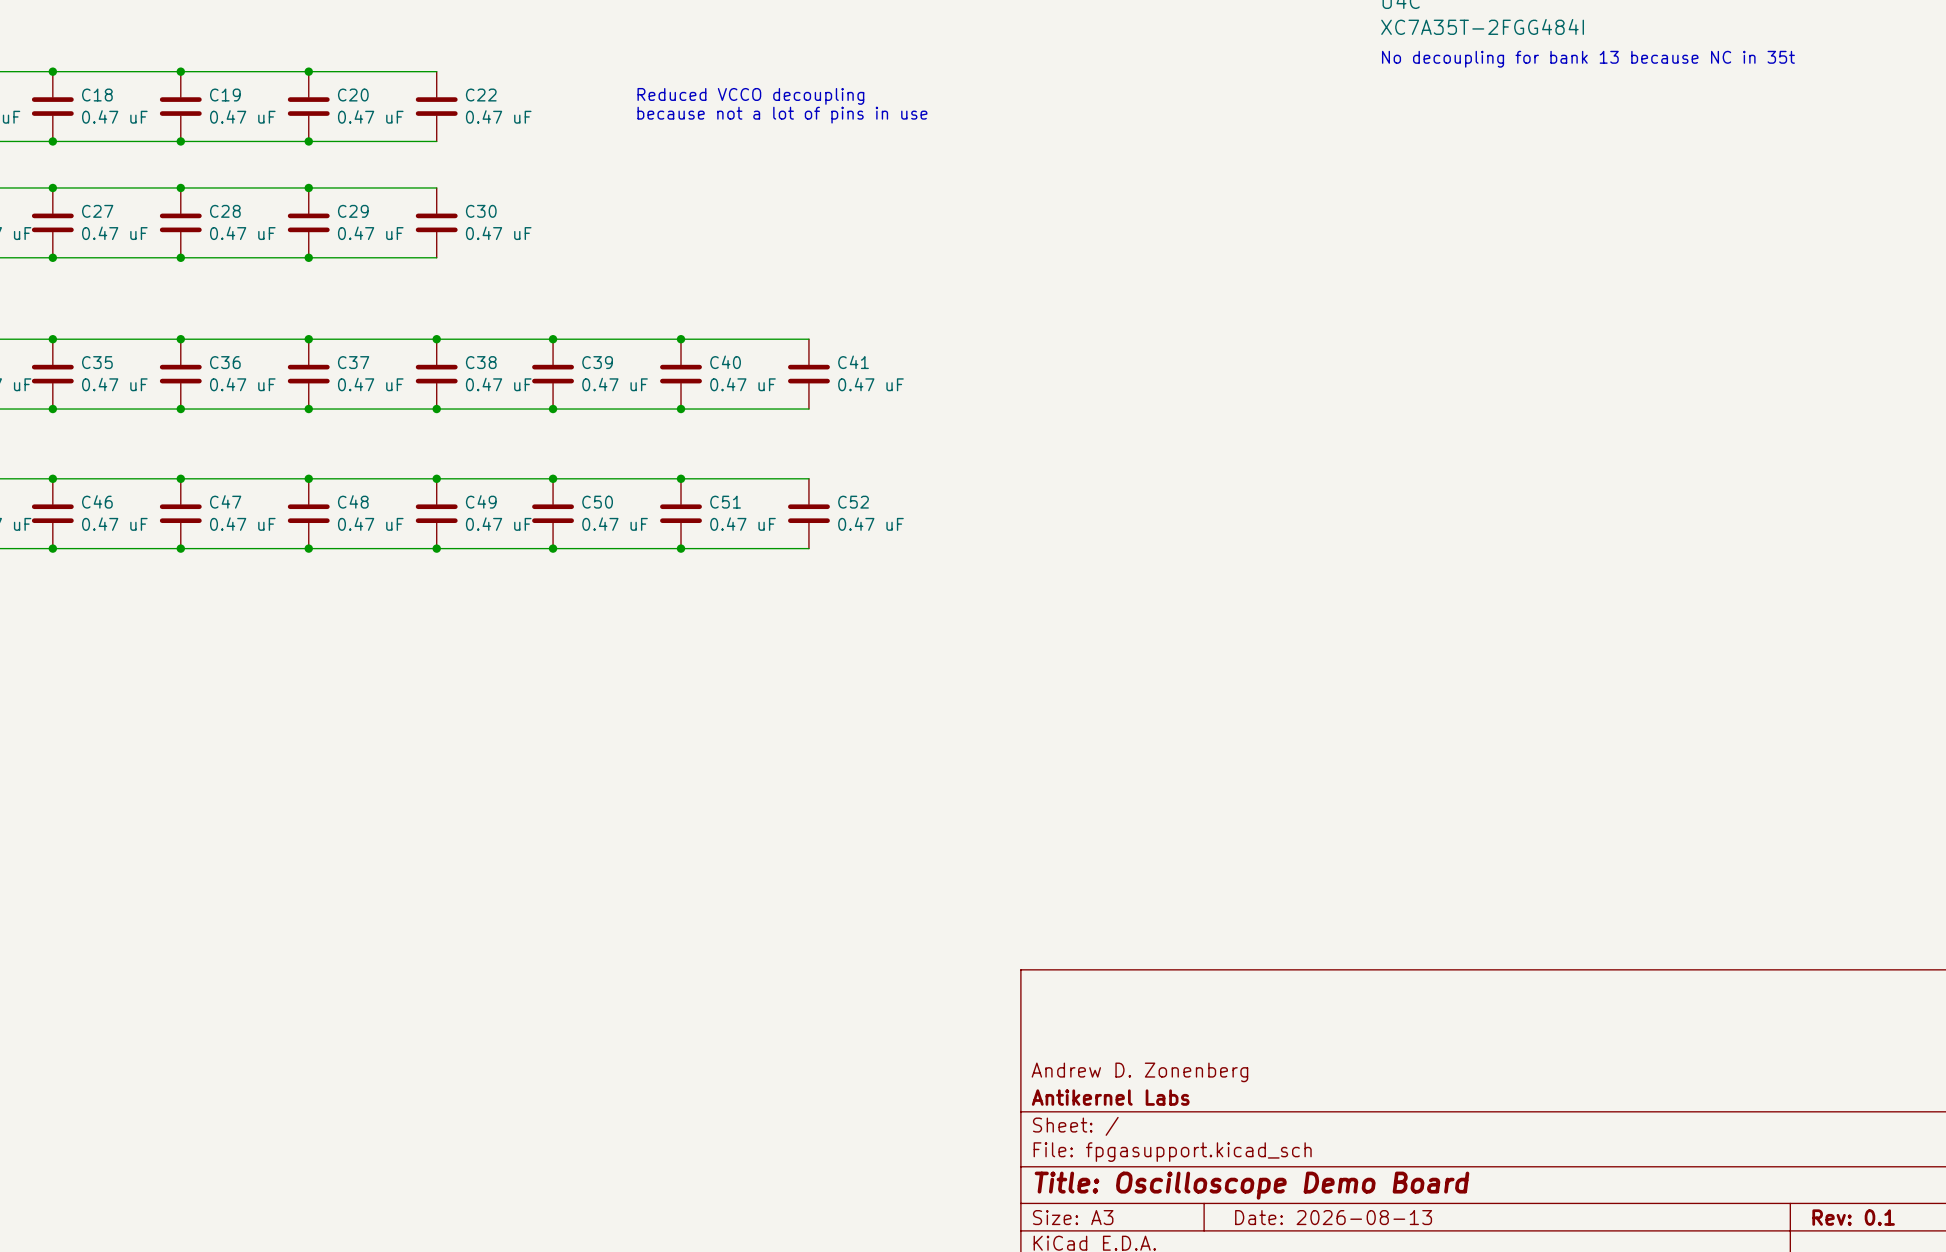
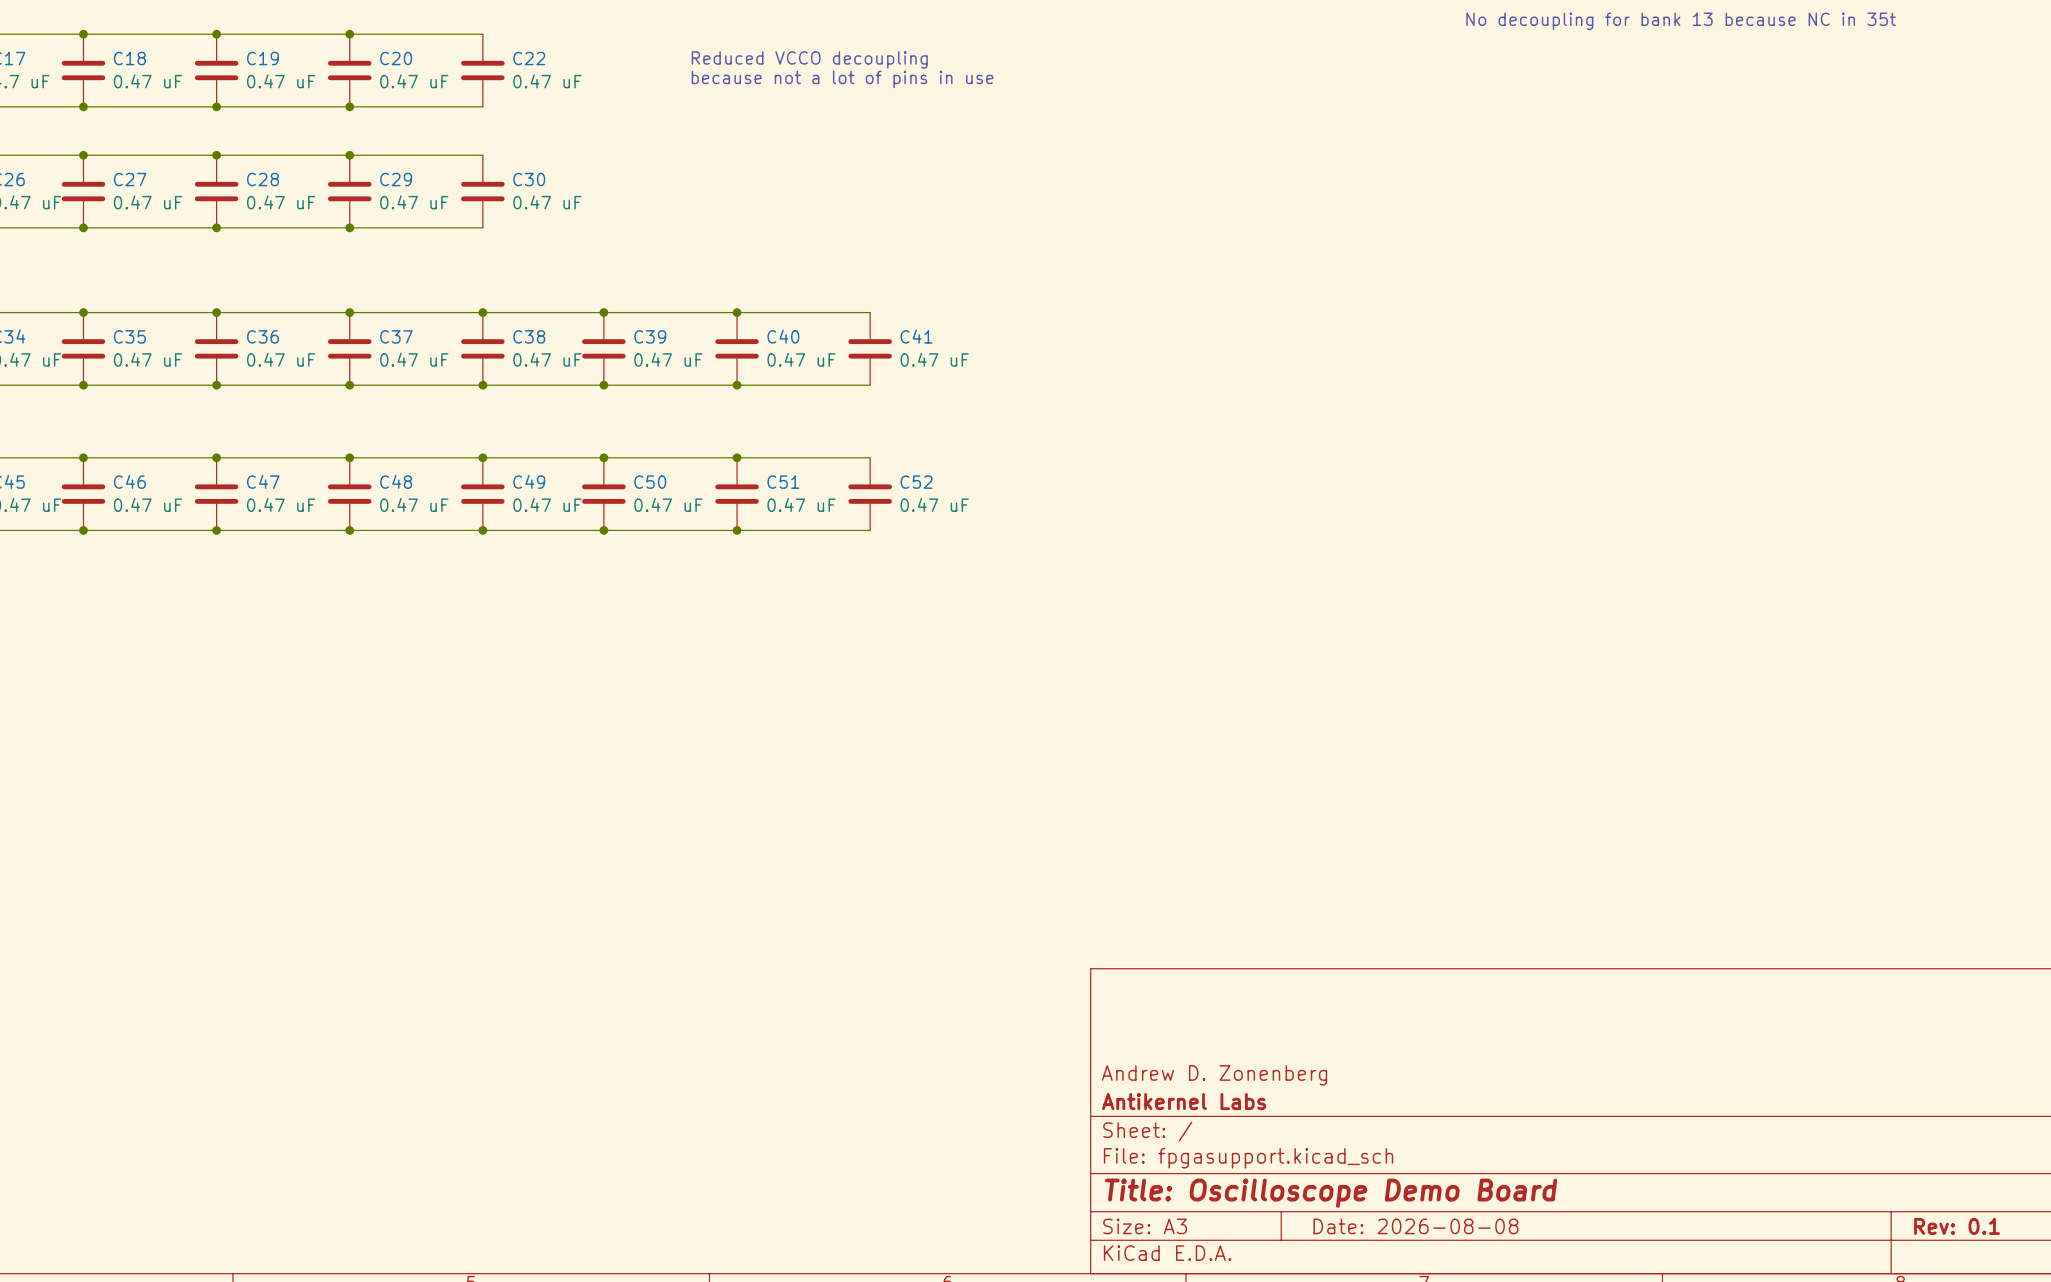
title block: Date: 2026-08-13 (1333, 1217) -> Date: 2026-08-08 (1415, 1226)

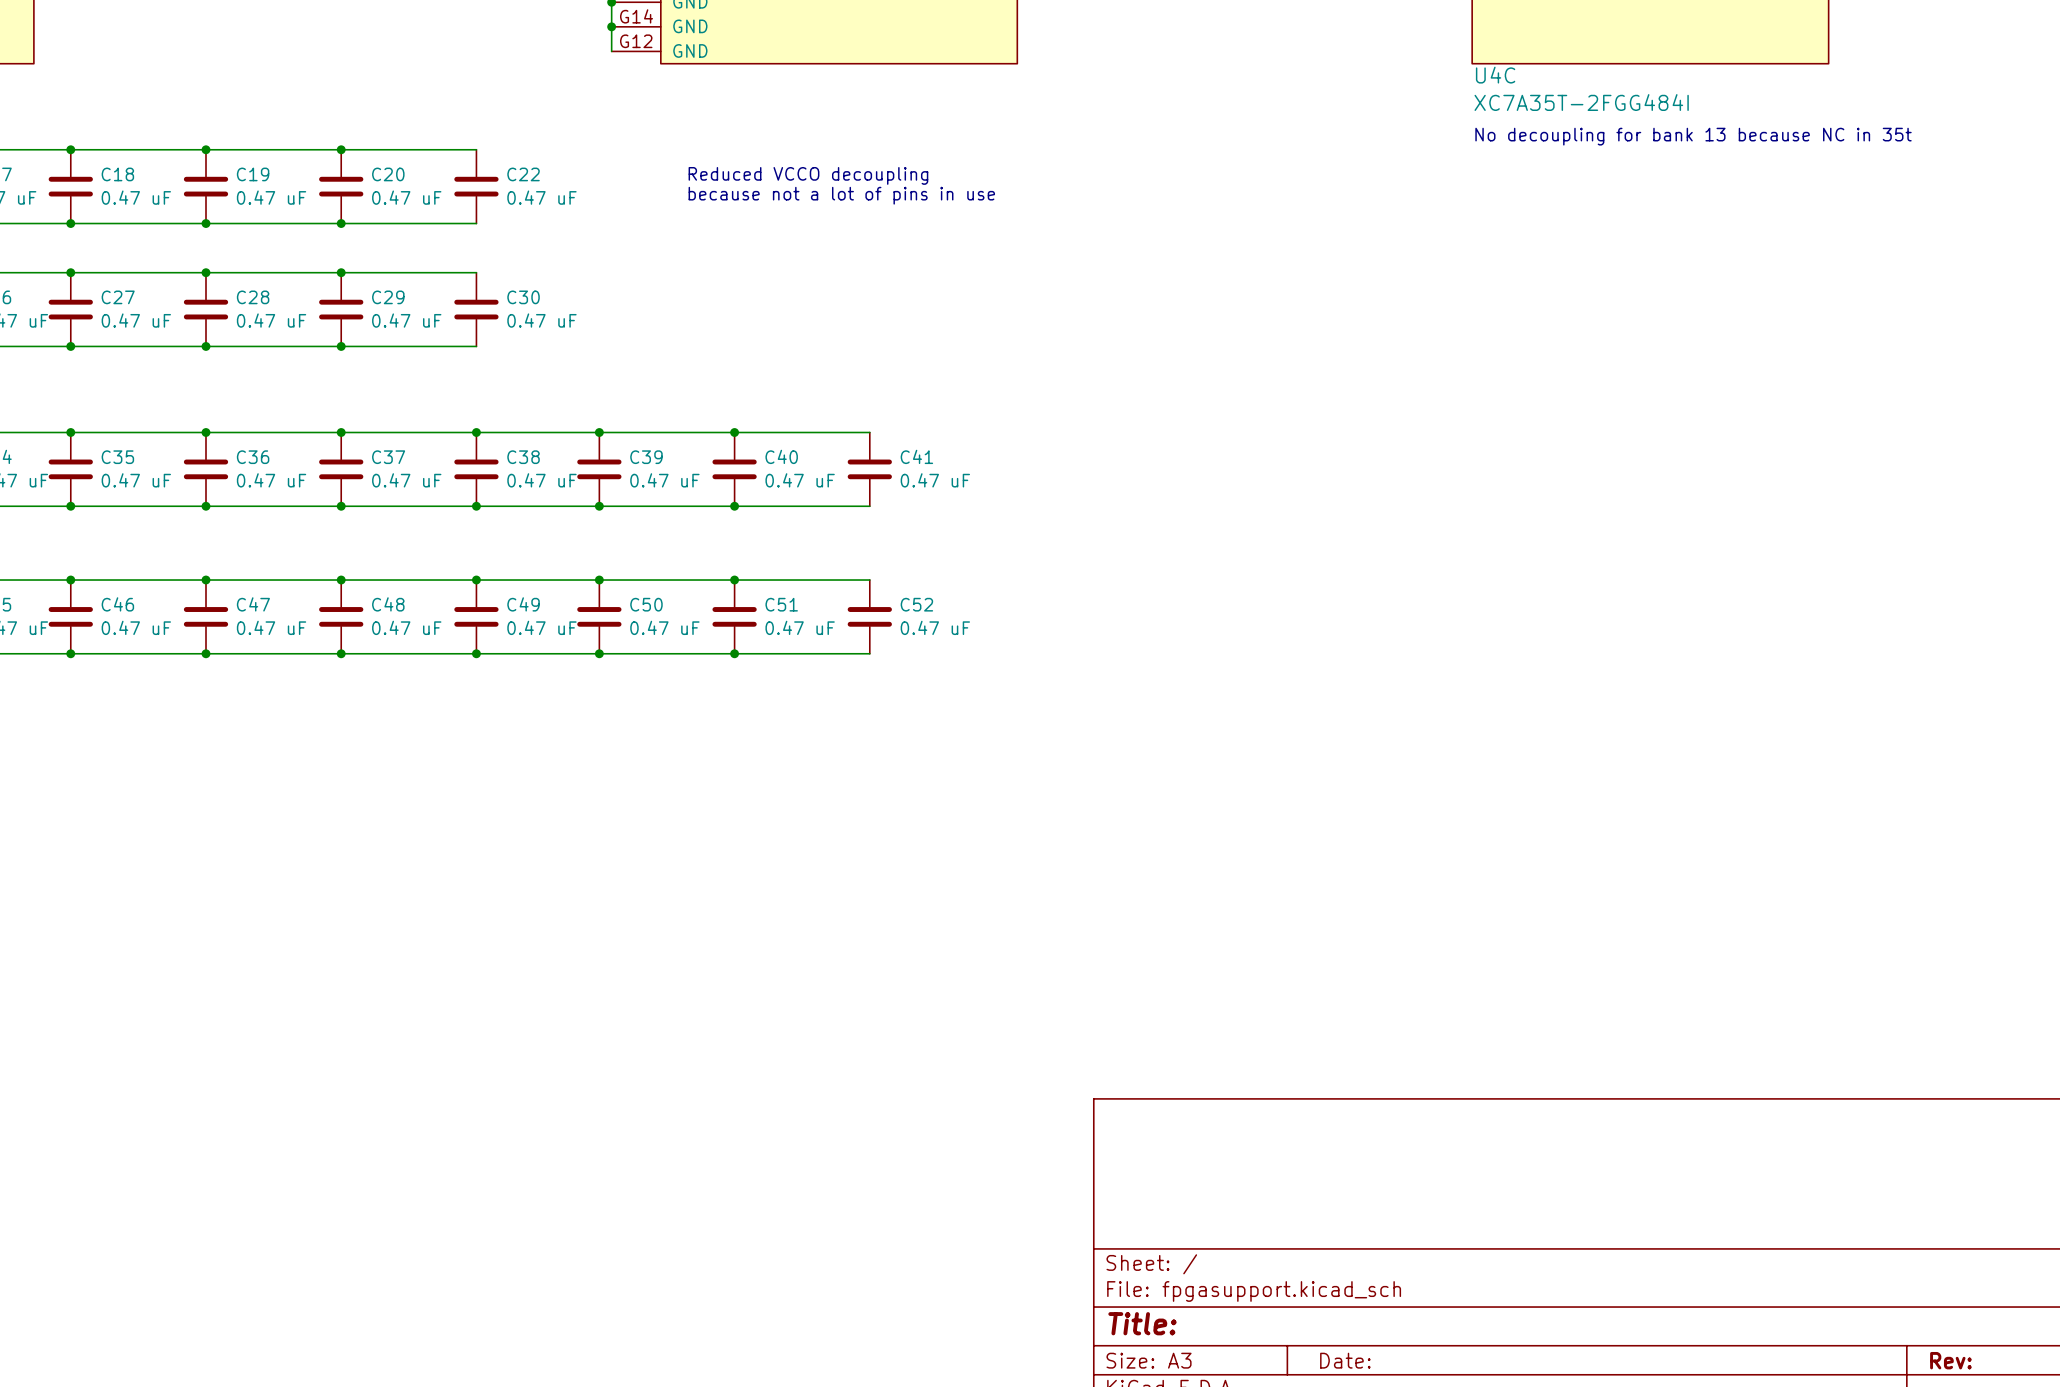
title block: Andrew D. Zonenberg (1214, 1075) -> none
title block: Antikernel Labs (1184, 1101) -> none
title block: Title: Oscilloscope Demo Board (1331, 1193) -> Title: (1142, 1323)
title block: Date: 2026-08-08 (1415, 1226) -> Date: (1345, 1360)
title block: Rev: 0.1 (1957, 1226) -> Rev: (1950, 1360)

